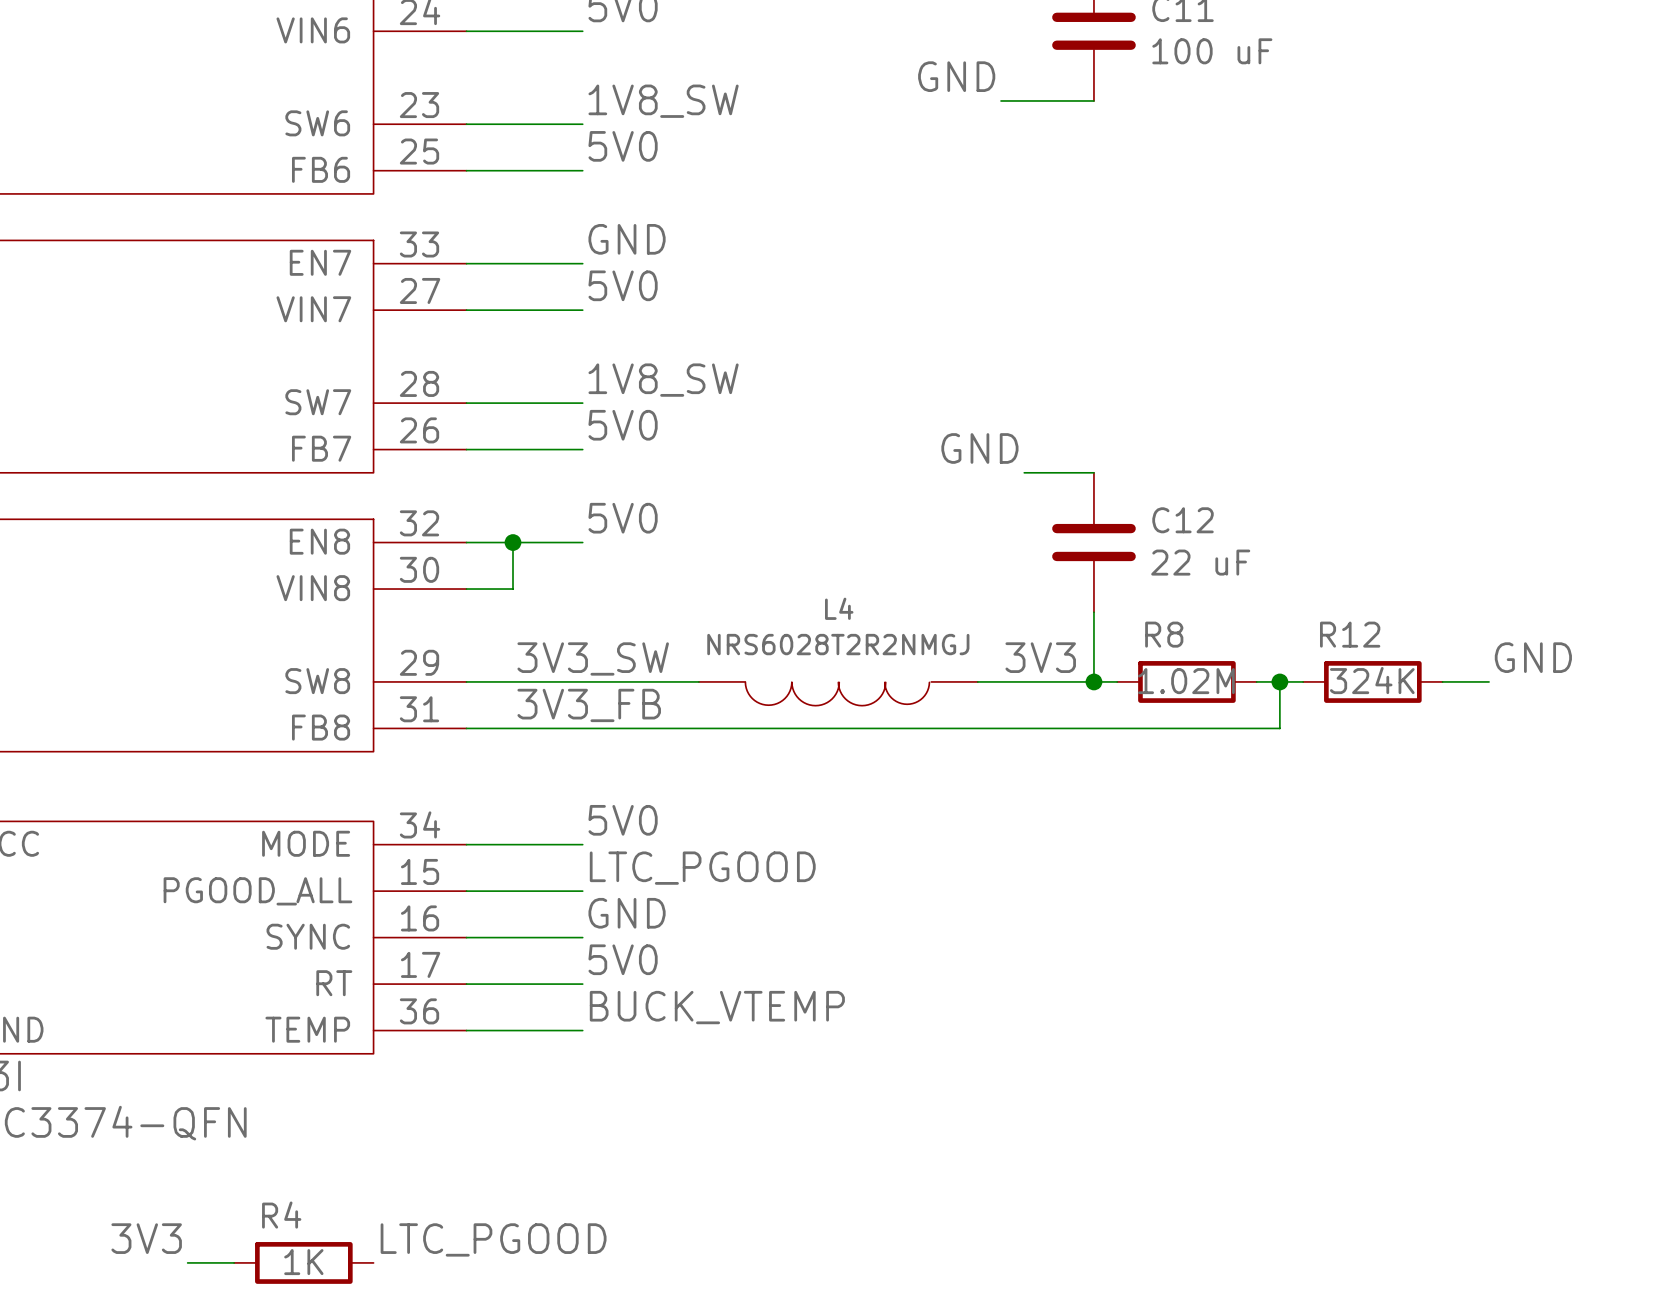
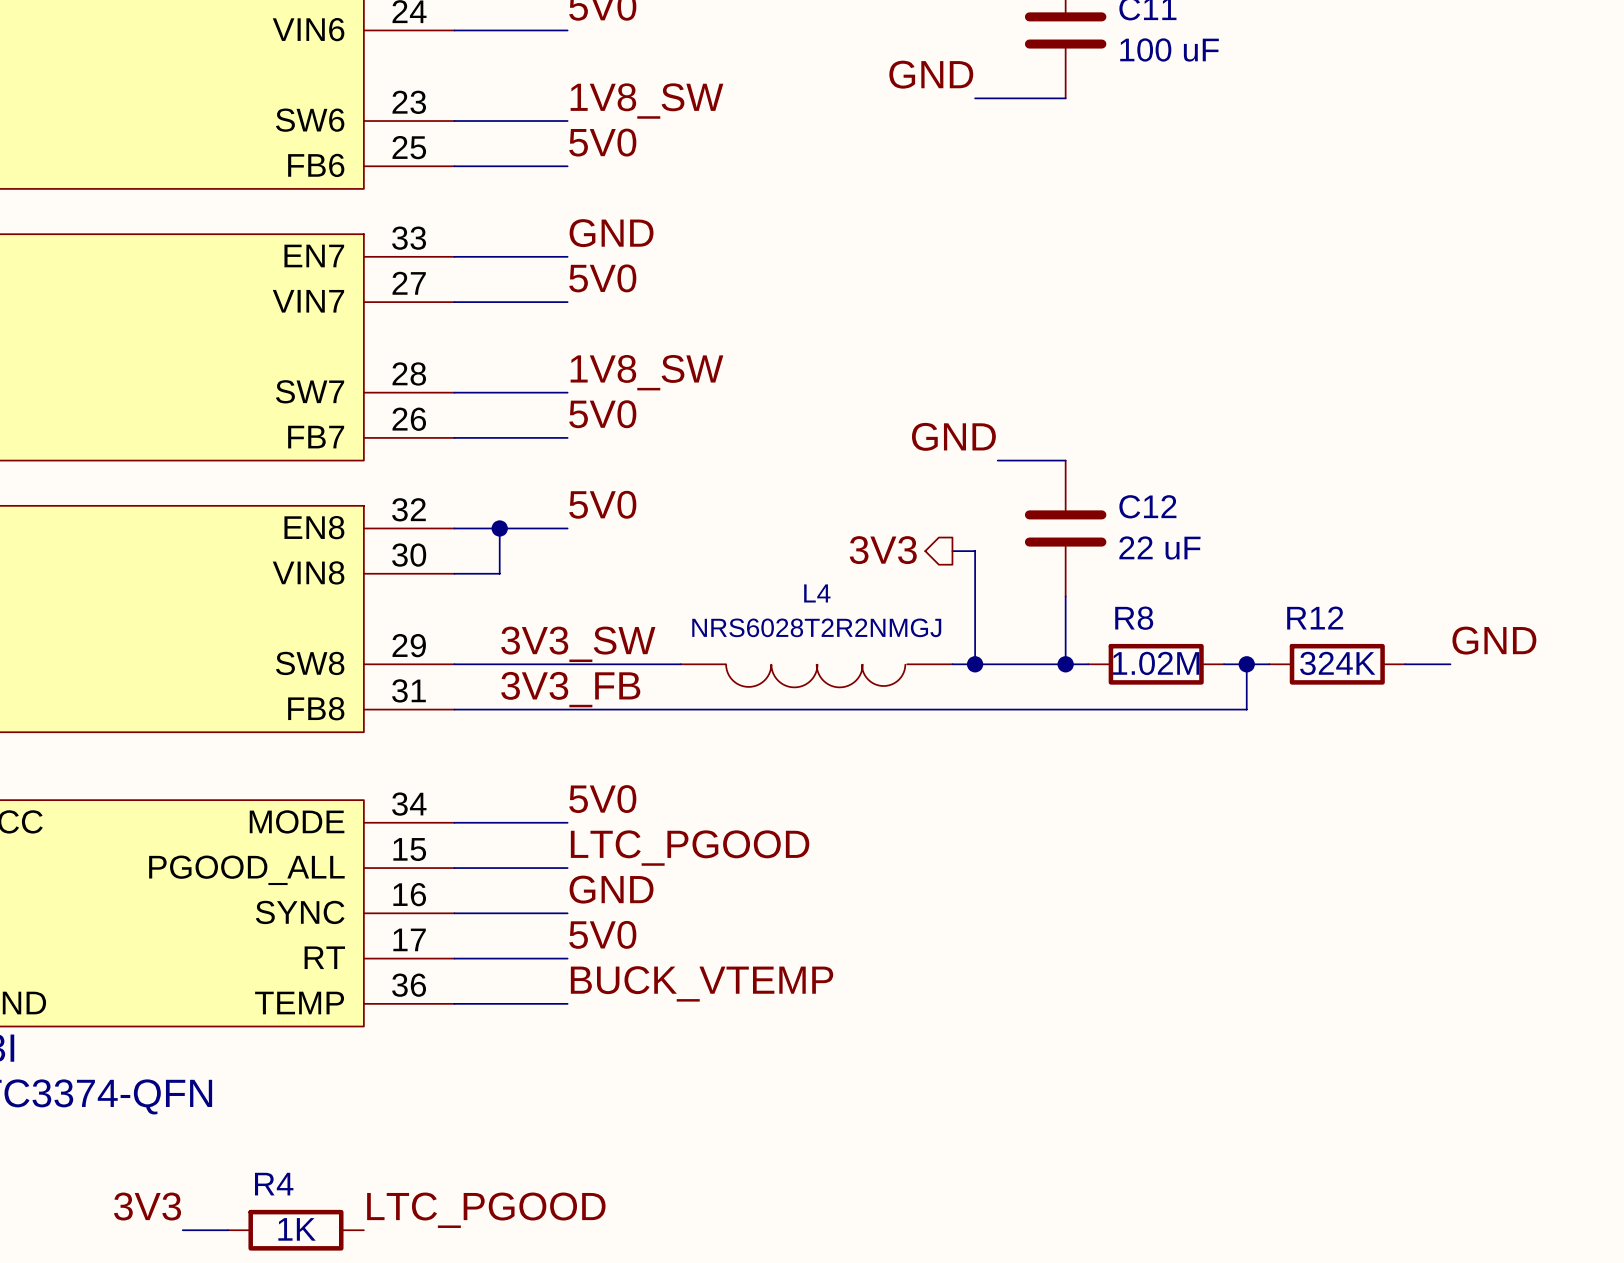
hierarchical label: none -> 3V3 (883, 550)
wire: none -> (952, 551) (975, 551) (975, 664)
label: 3V3 (1040, 657) -> none
junction: none -> (975, 664)

